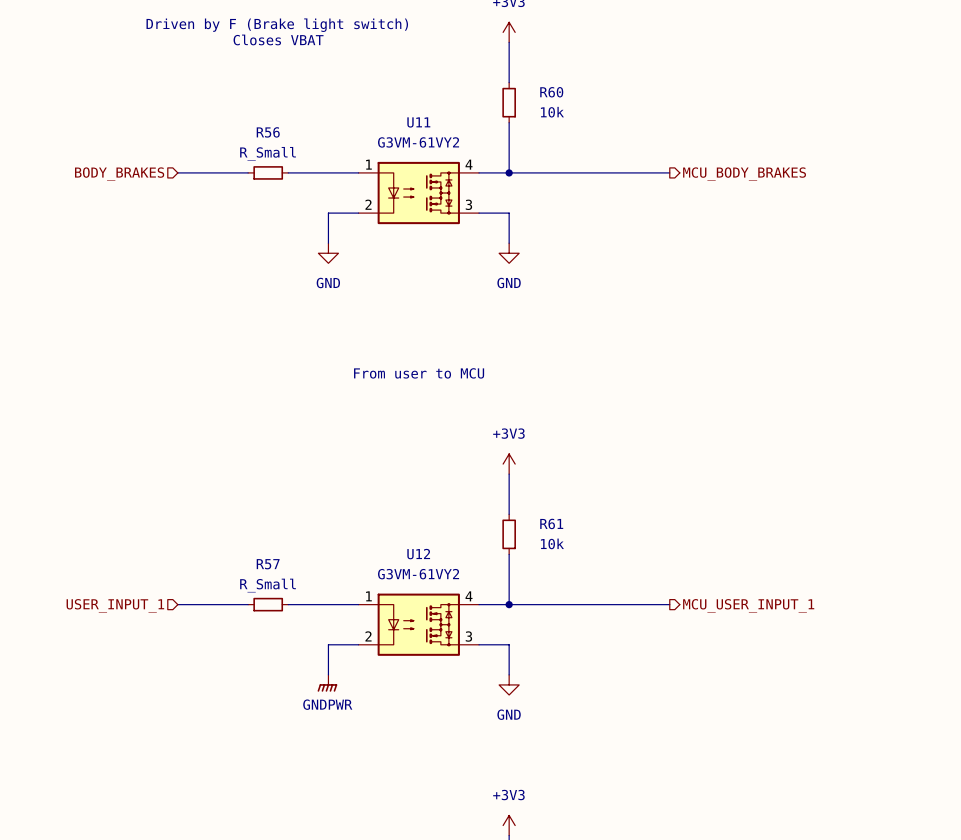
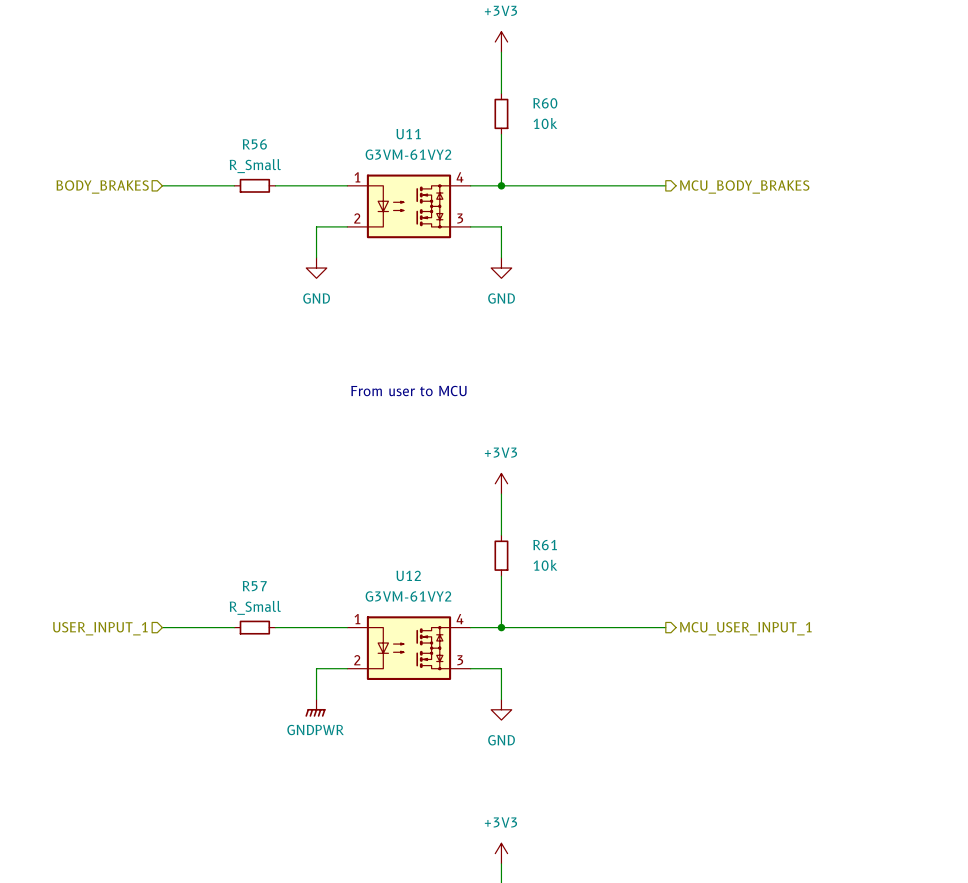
text: Driven by F (Brake light switch) (277, 25) -> none
text: Closes VBAT (278, 39) -> none

